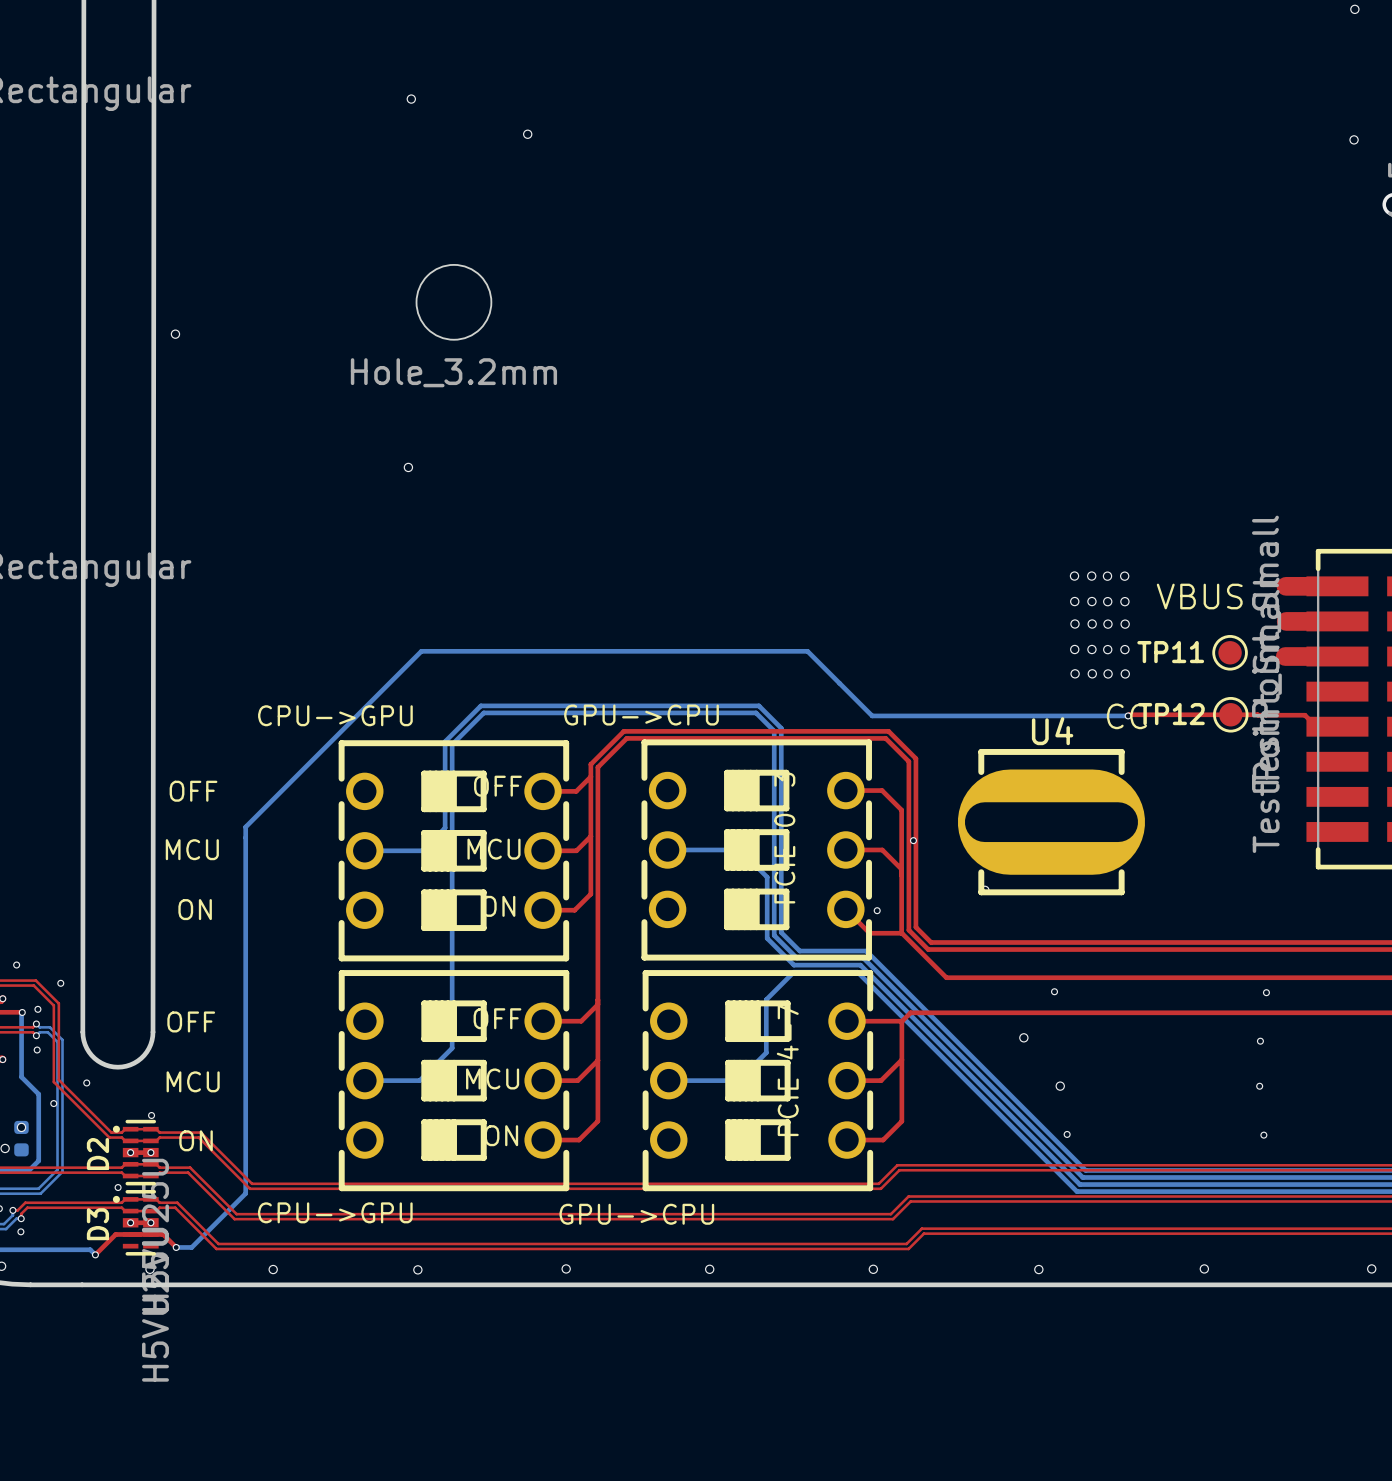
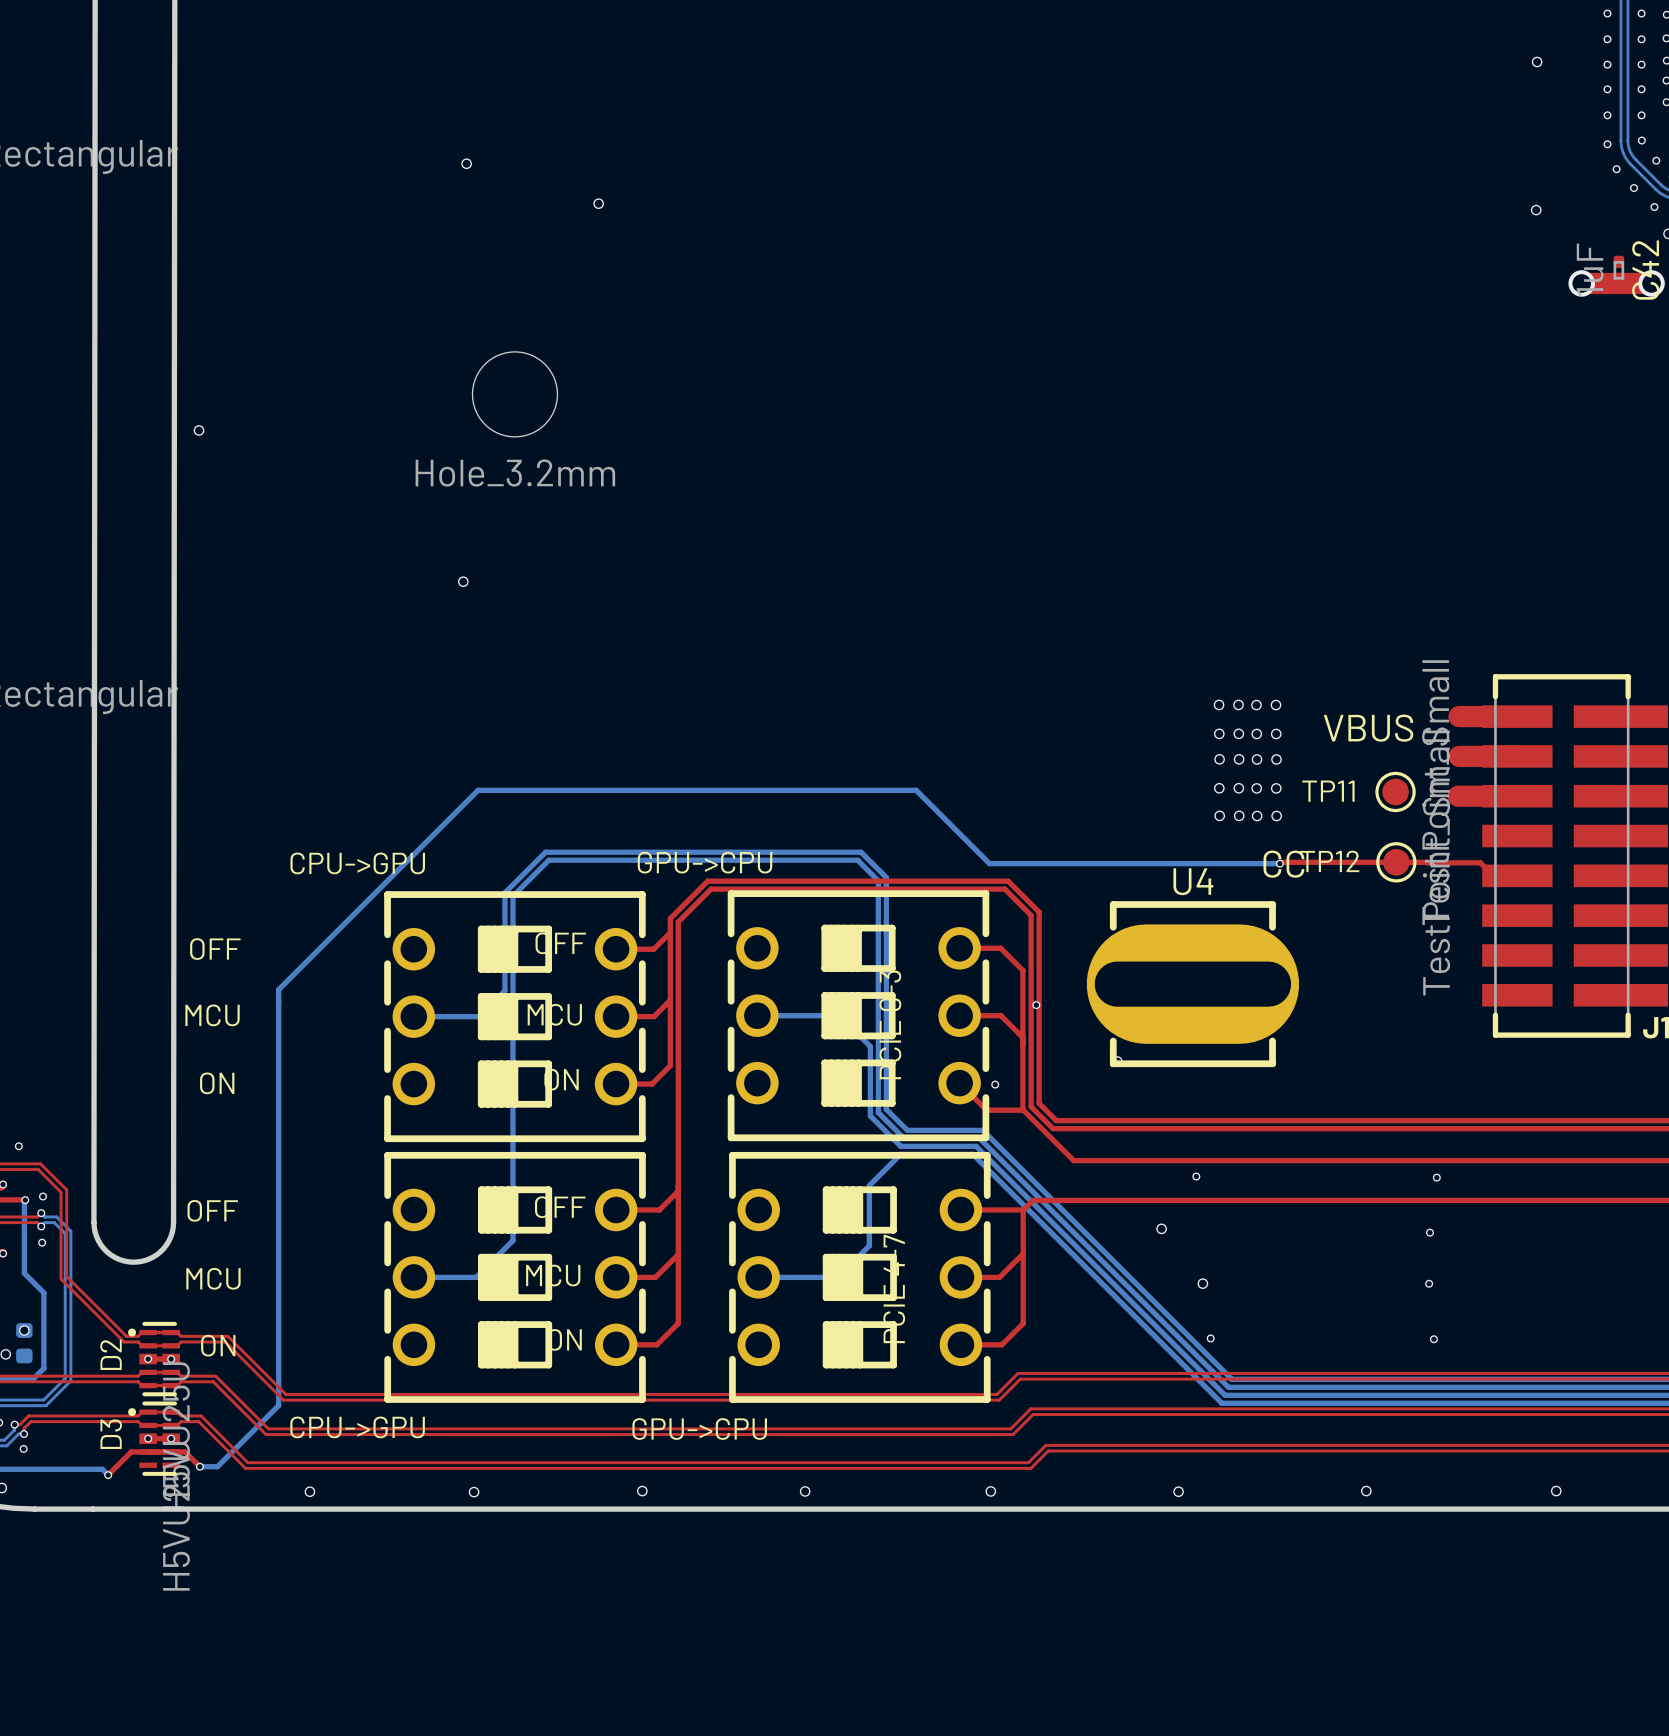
via: (60, 983) -> none
via: (86, 1082) -> none
via: (53, 1103) -> none
via: (151, 1115) -> none
via: (118, 1187) -> none

